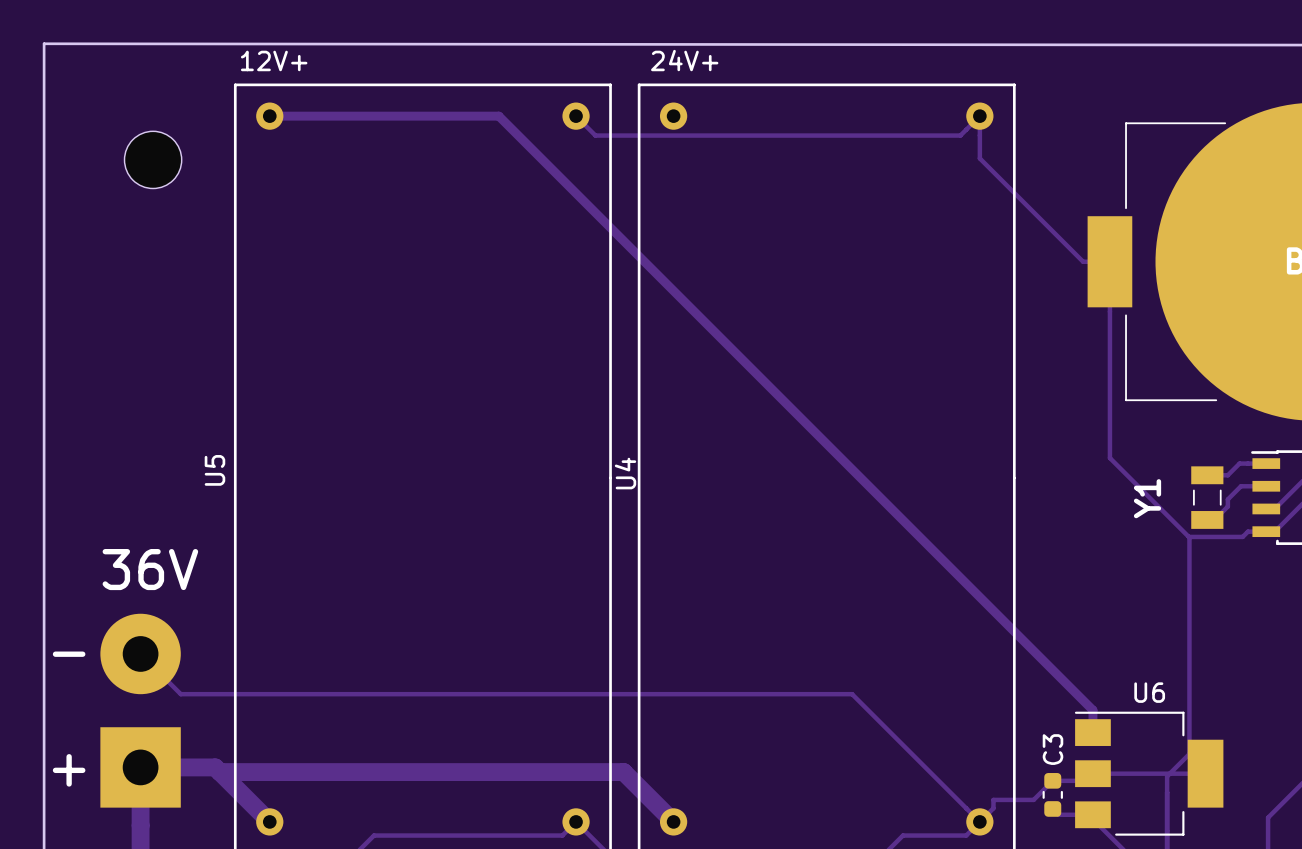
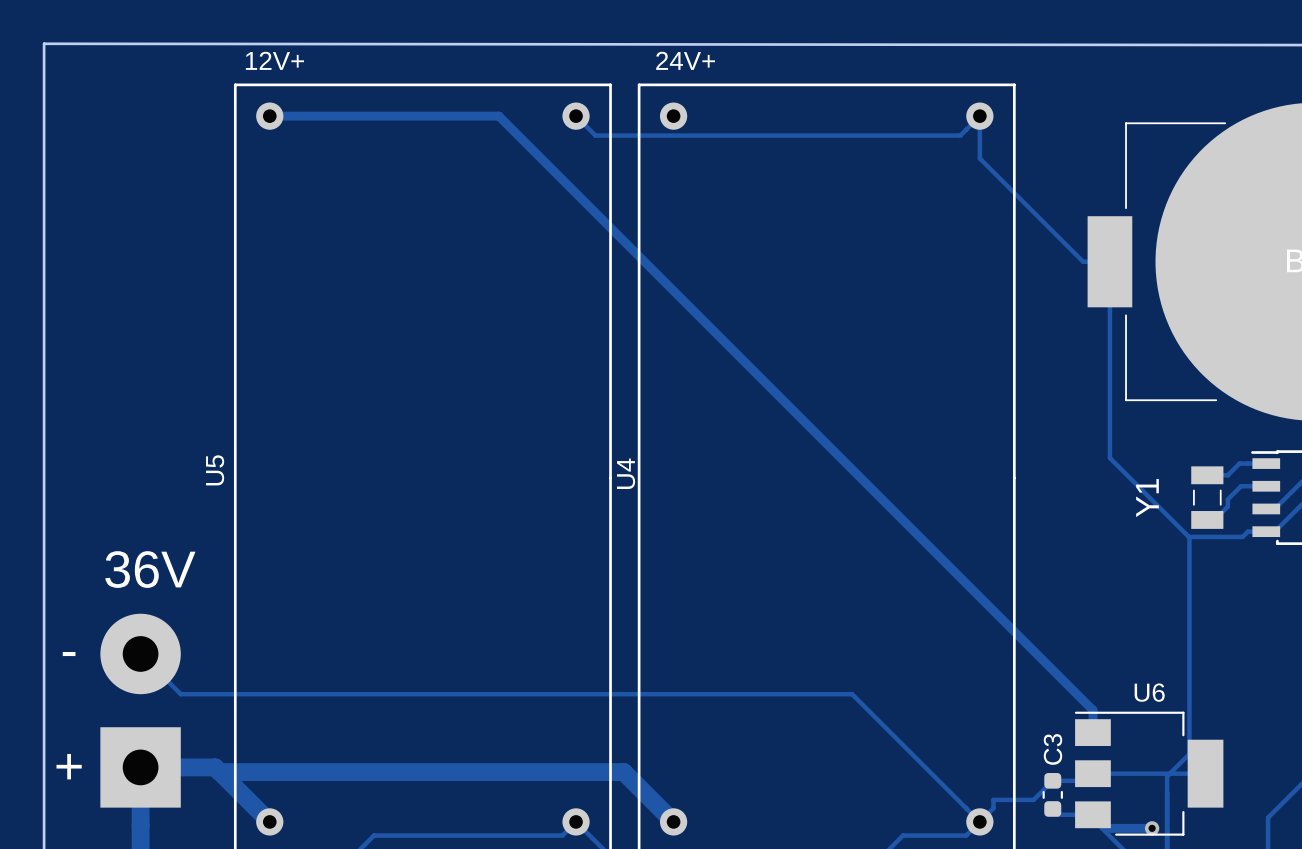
part: (153, 159) -> none
track: none -> (1092, 814) (1106, 828) (1152, 828)
via: none -> (1152, 828)

